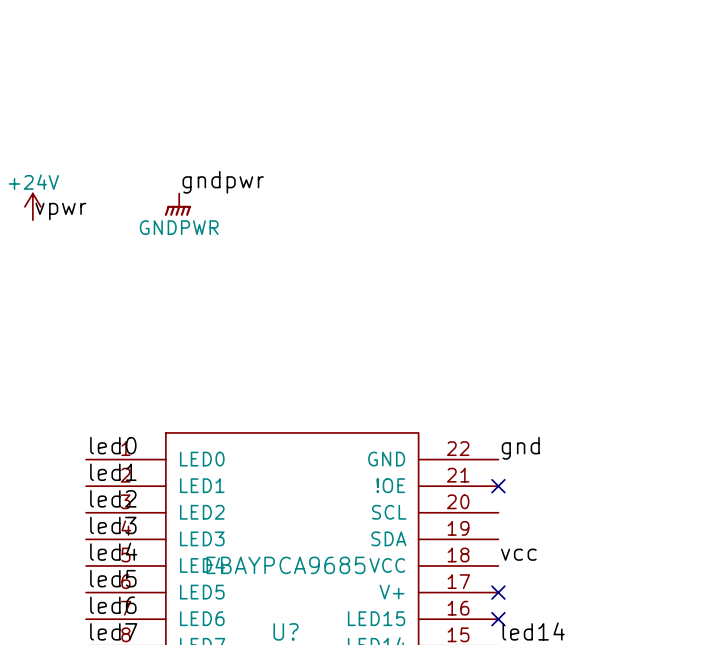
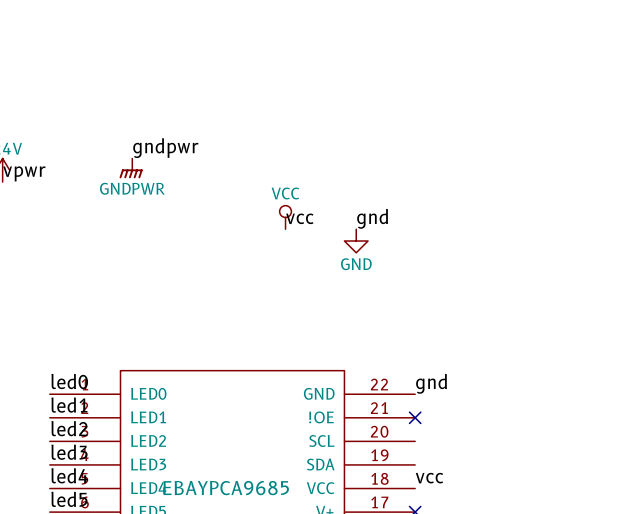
power symbol: none -> VCC (285, 217)
label: none -> vcc (299, 218)
label: none -> gnd (372, 218)
power symbol: none -> GND (356, 241)

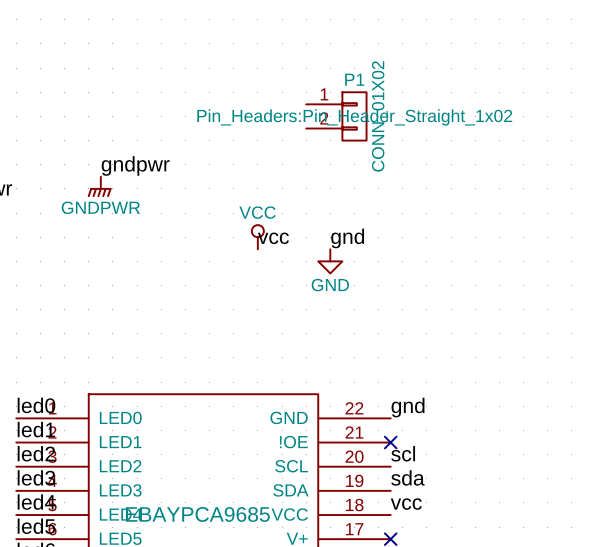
P1: none -> CONN_01X02 (336, 116)
label: none -> scl (403, 453)
label: none -> sda (407, 477)

